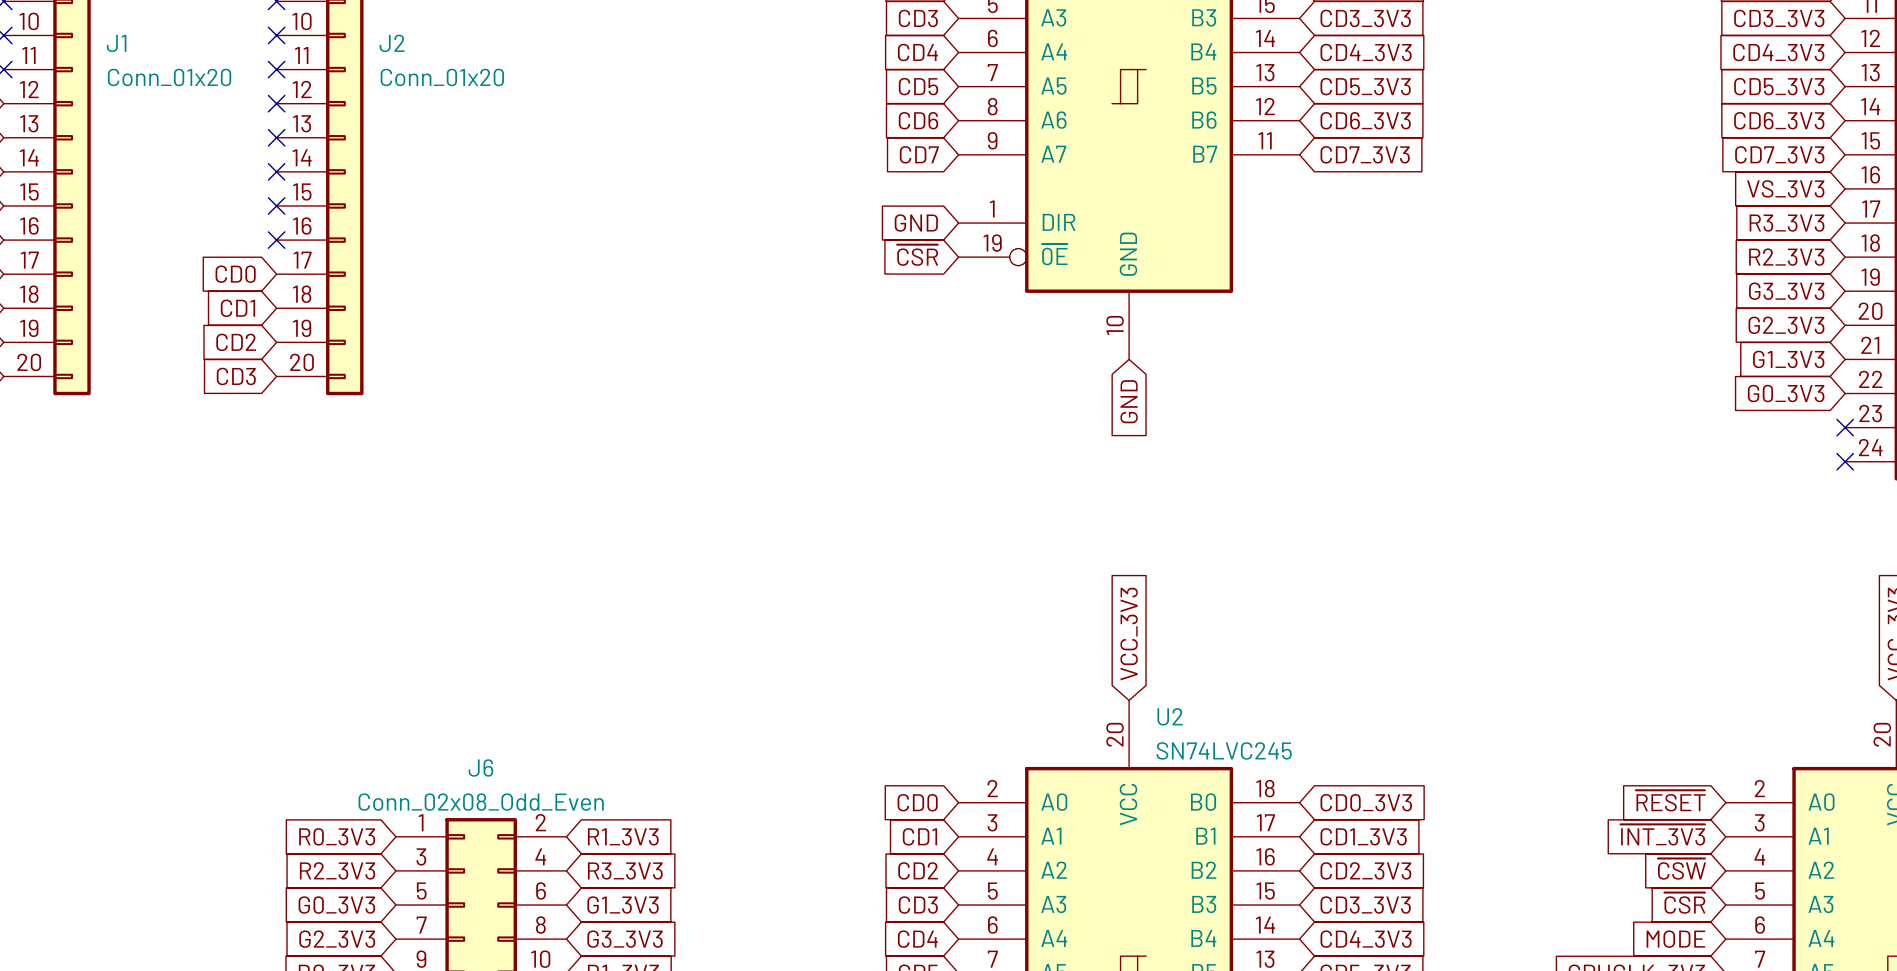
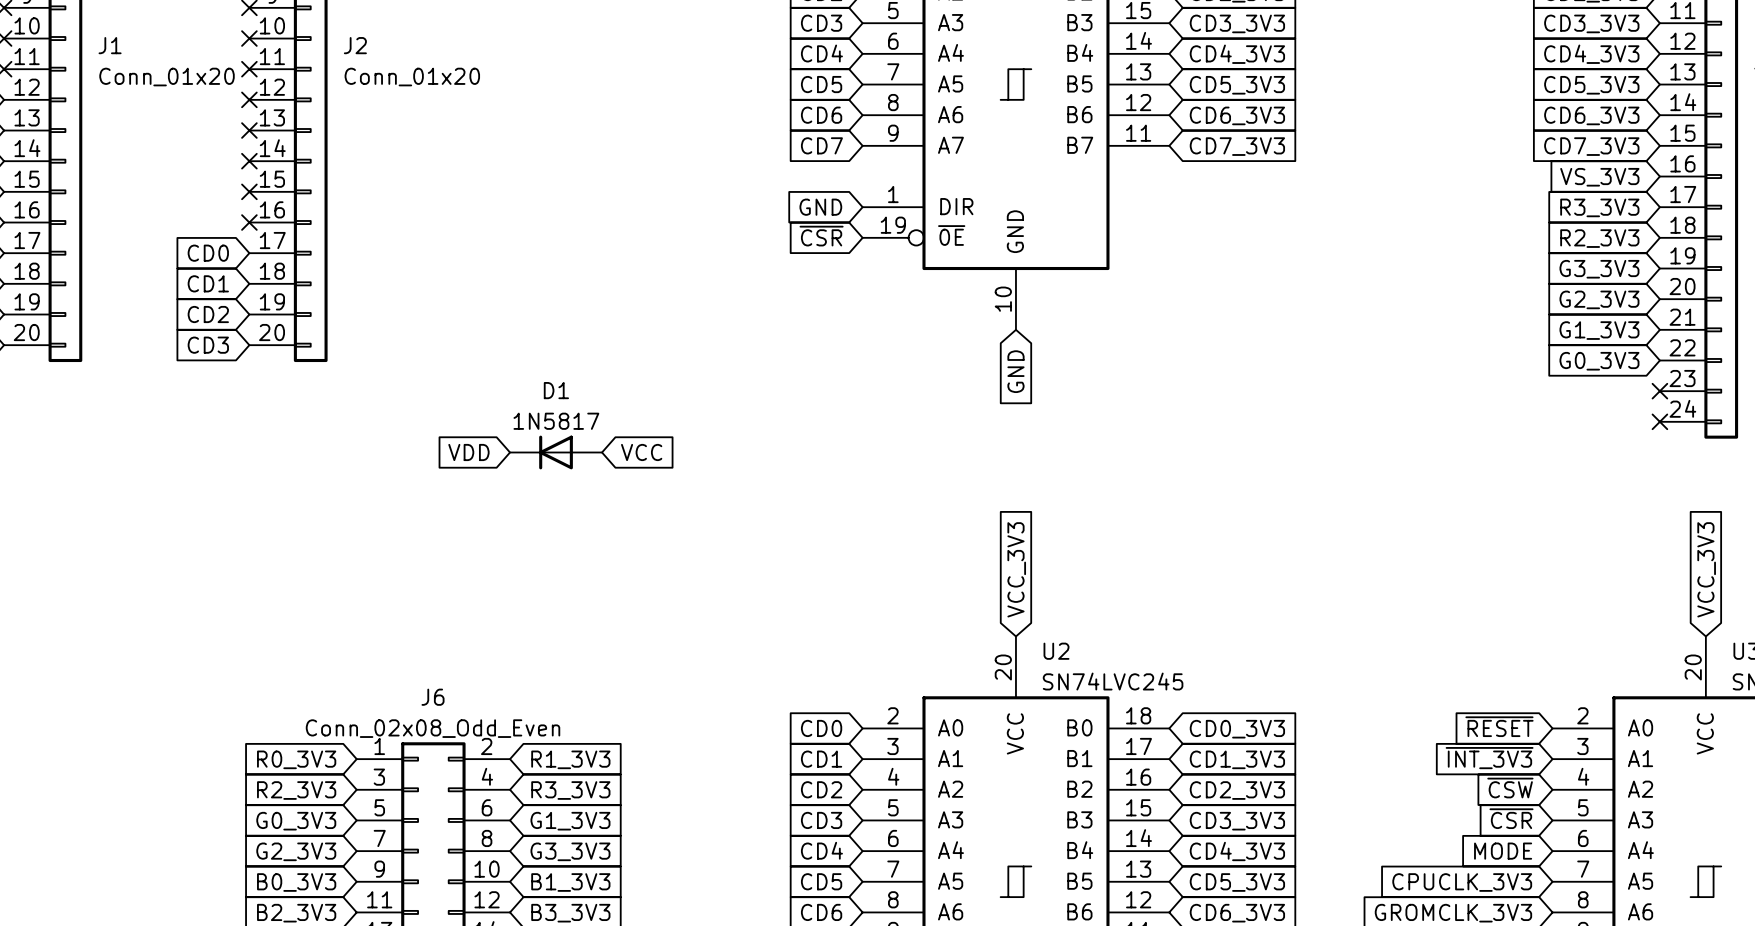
global label: none -> VDD (468, 452)
D1: none -> 1N5817 (556, 452)
global label: none -> VCC (641, 452)

